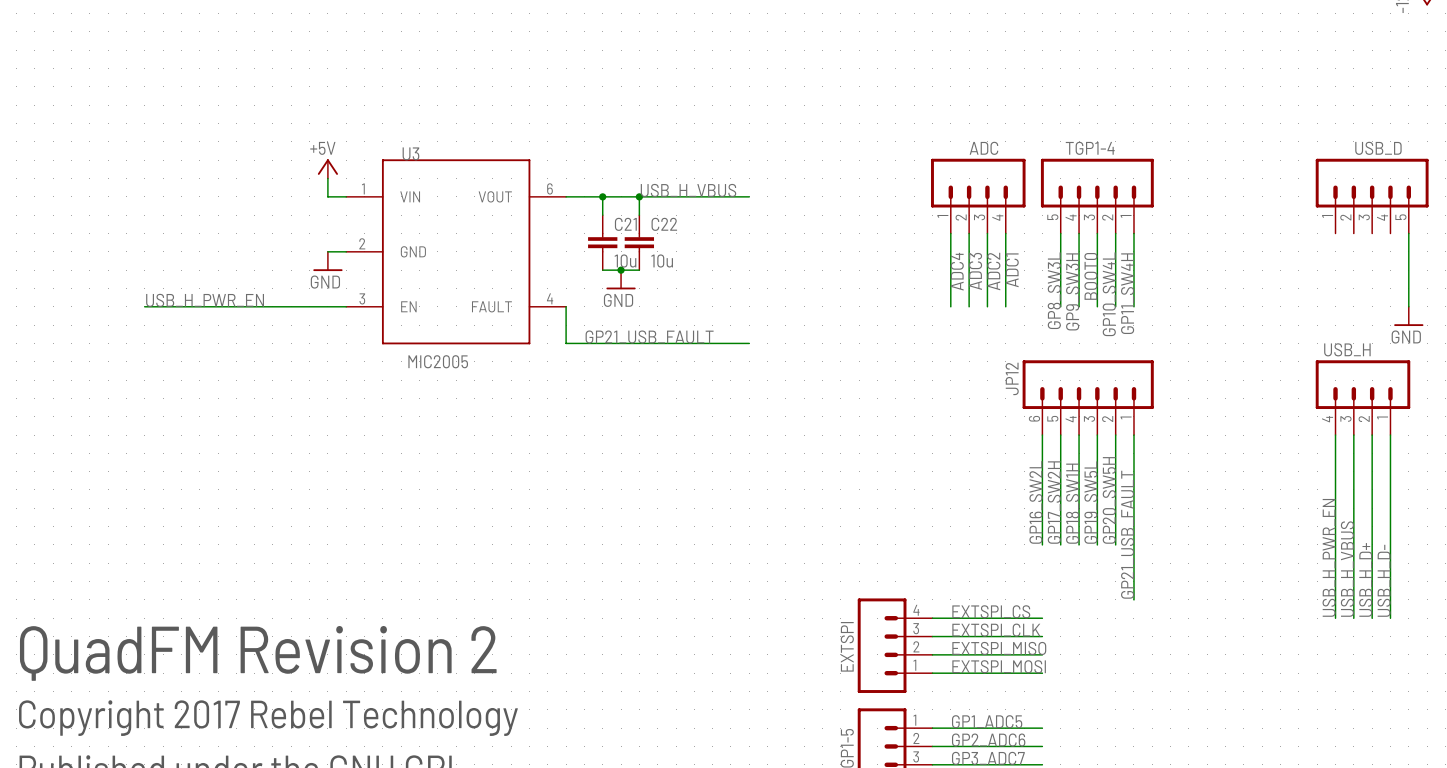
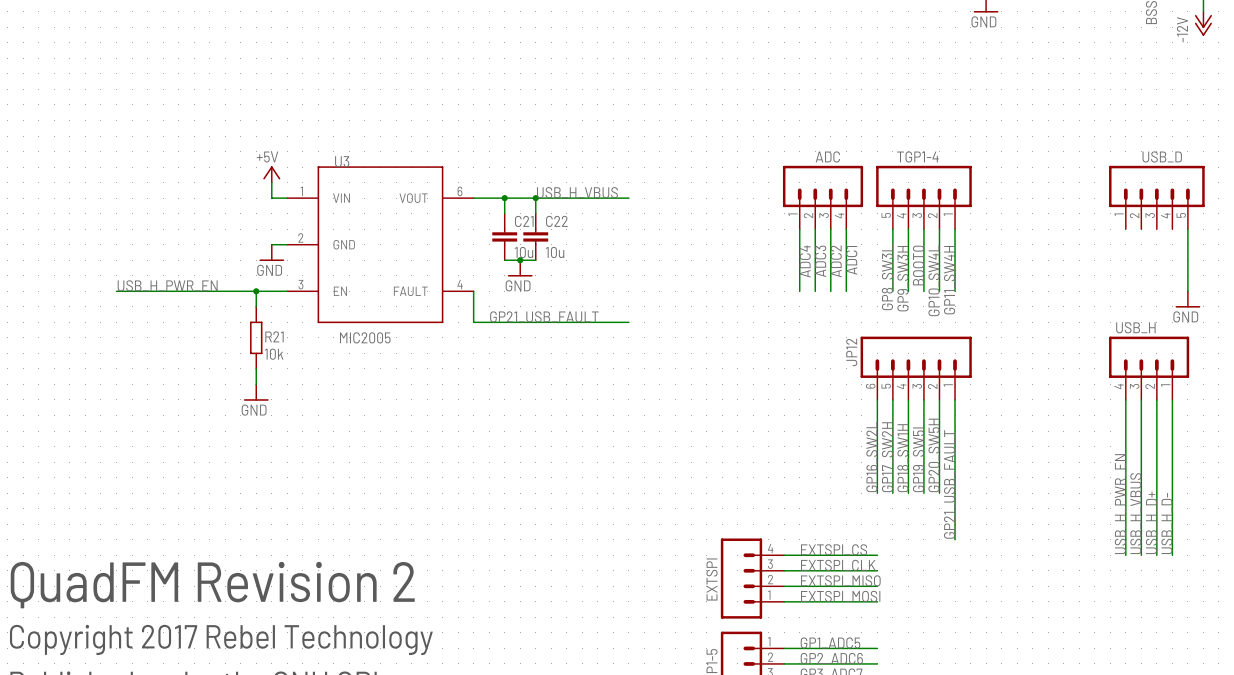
wire: none -> (256, 291) (256, 306)
junction: none -> (256, 291)
R21: none -> 10k (256, 337)
wire: none -> (256, 368) (256, 384)
power symbol: none -> GND (256, 392)

